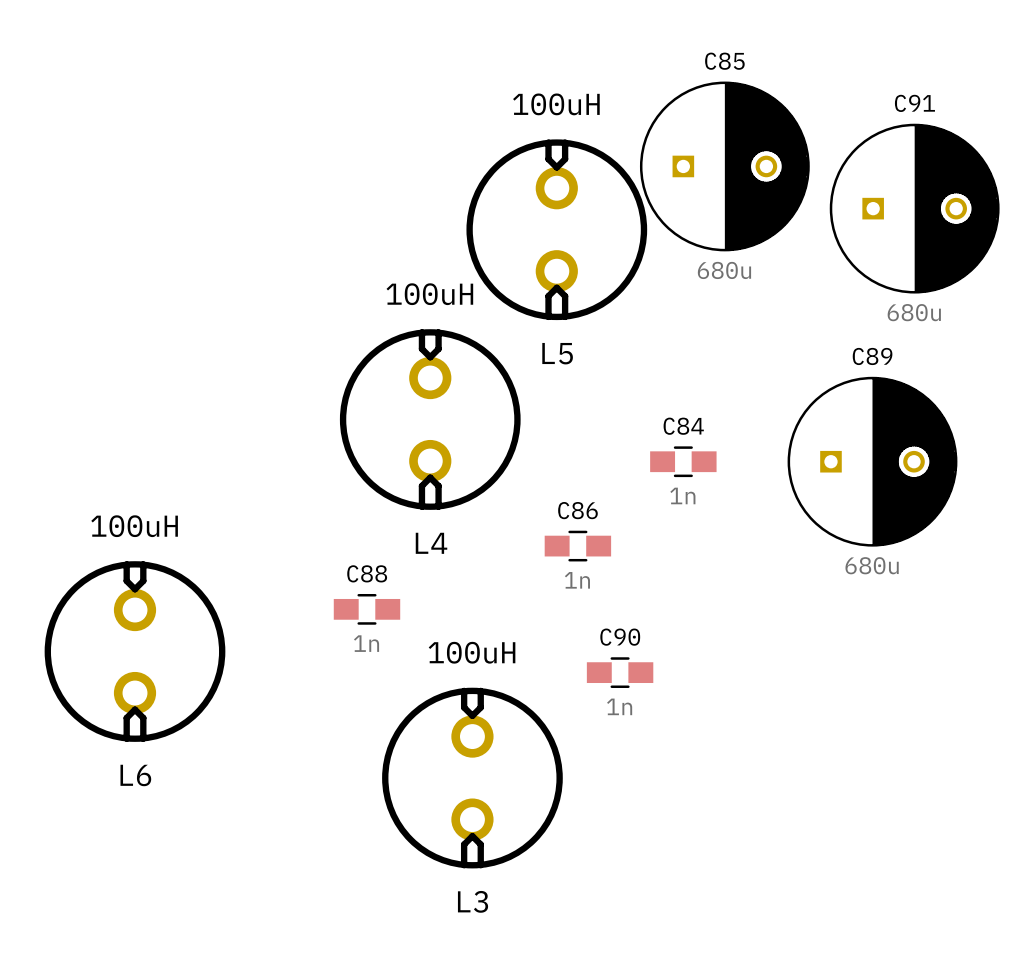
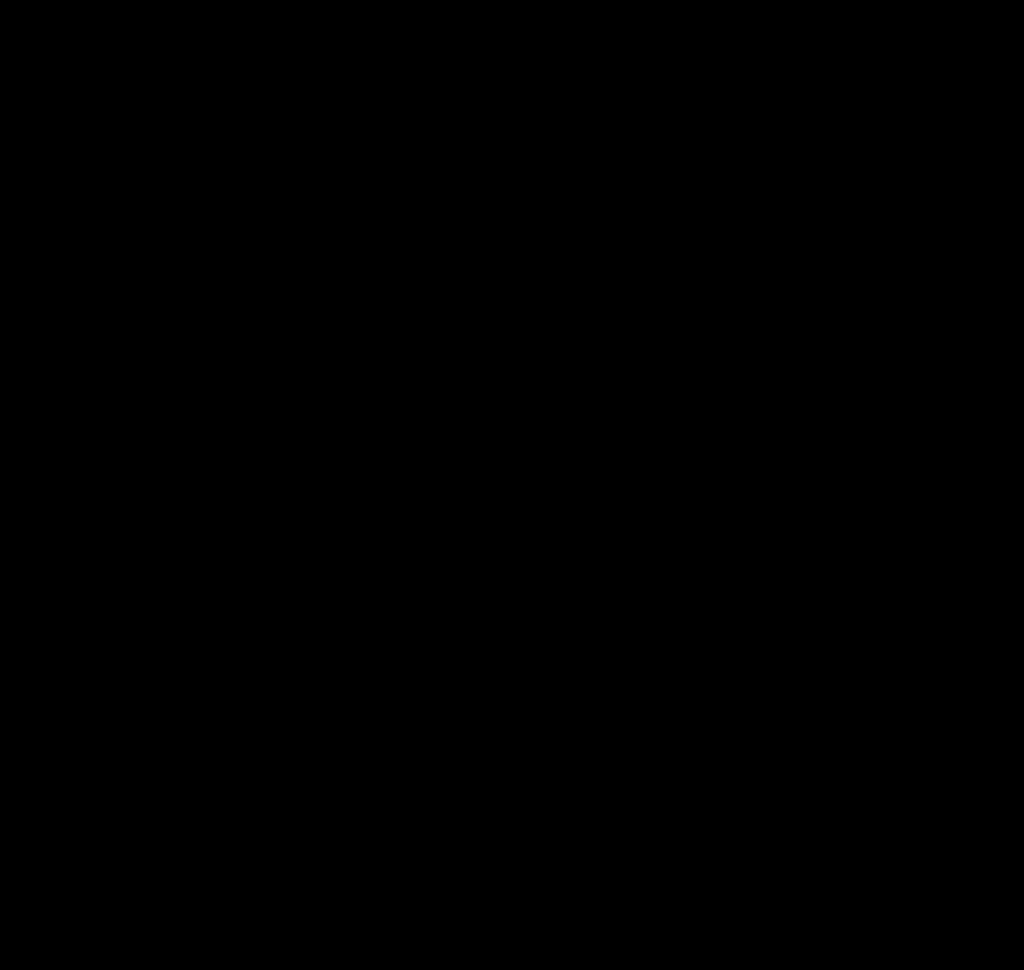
C85: 680u (724, 166) -> none
C91: 680u (914, 208) -> none
L5: 100uH (556, 229) -> none
L4: 100uH (430, 419) -> none
C84: 1n (683, 461) -> none
C89: 680u (872, 461) -> none
C86: 1n (577, 546) -> none
C88: 1n (366, 609) -> none
L6: 100uH (135, 651) -> none
C90: 1n (620, 672) -> none
L3: 100uH (472, 778) -> none

